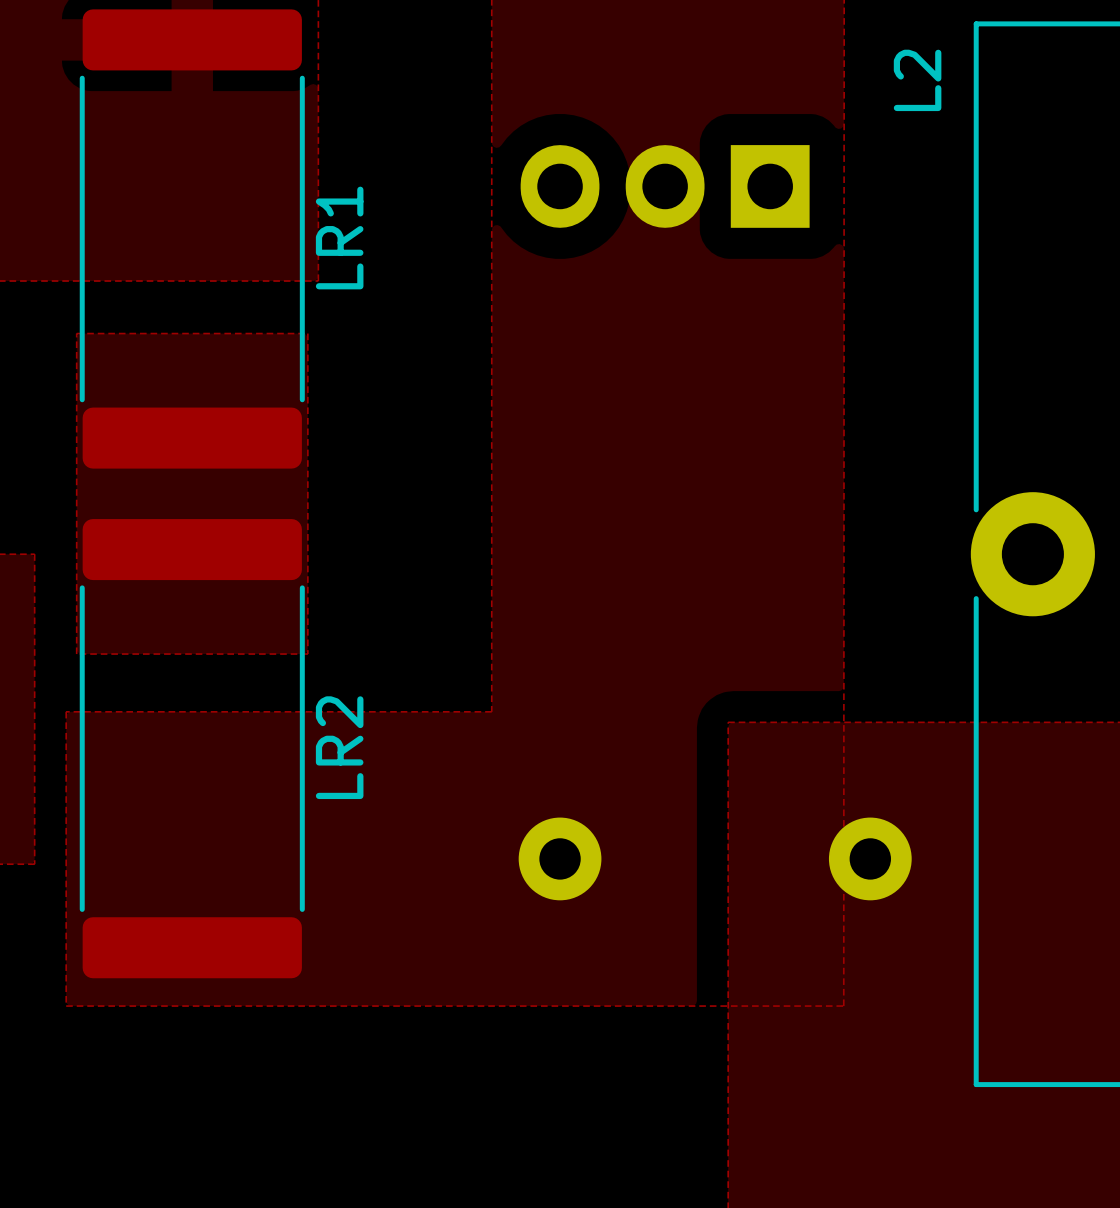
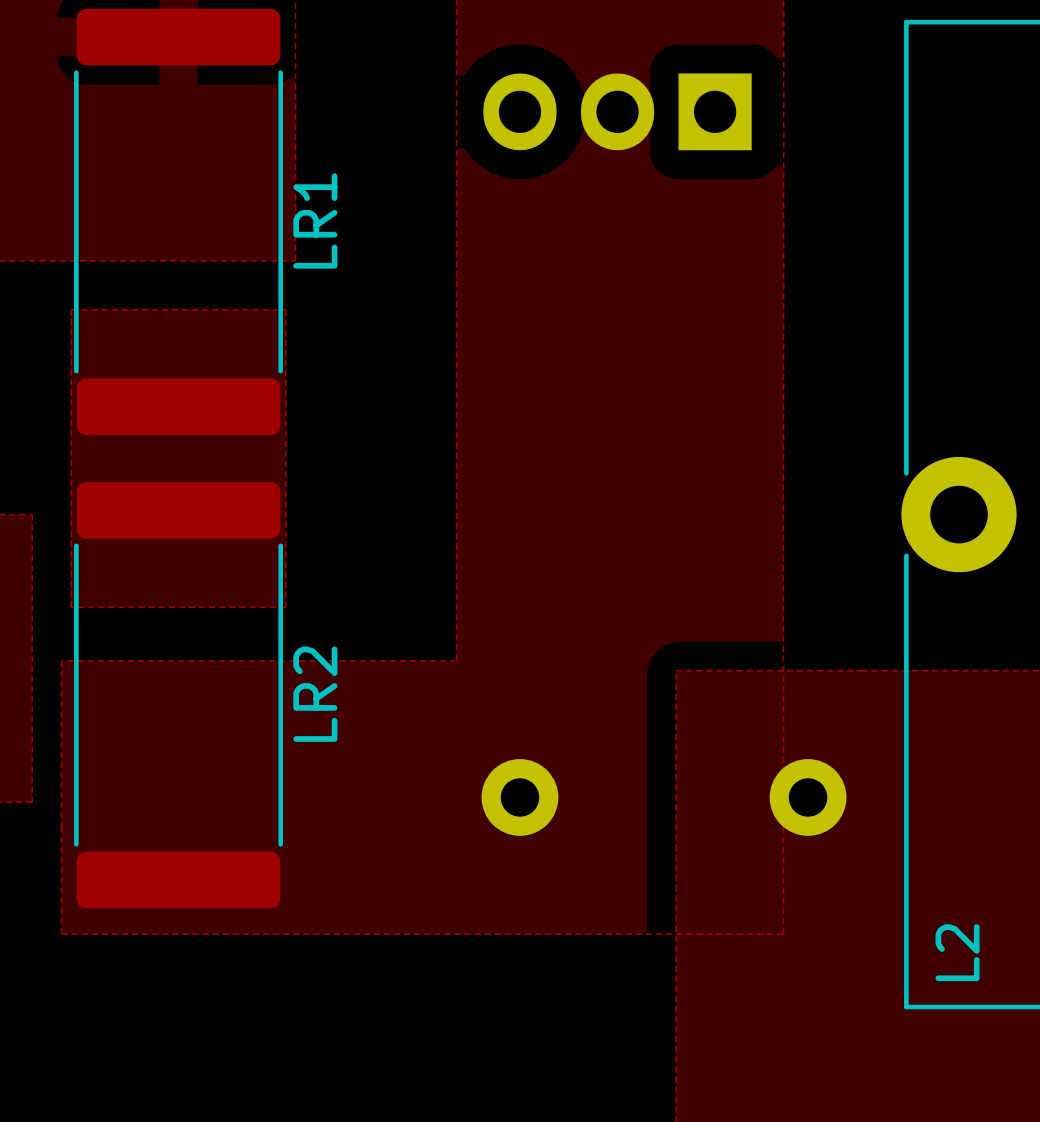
L2 name position: L2 (917, 80) -> L2 (957, 952)
part position: (665, 186) -> (617, 111)

